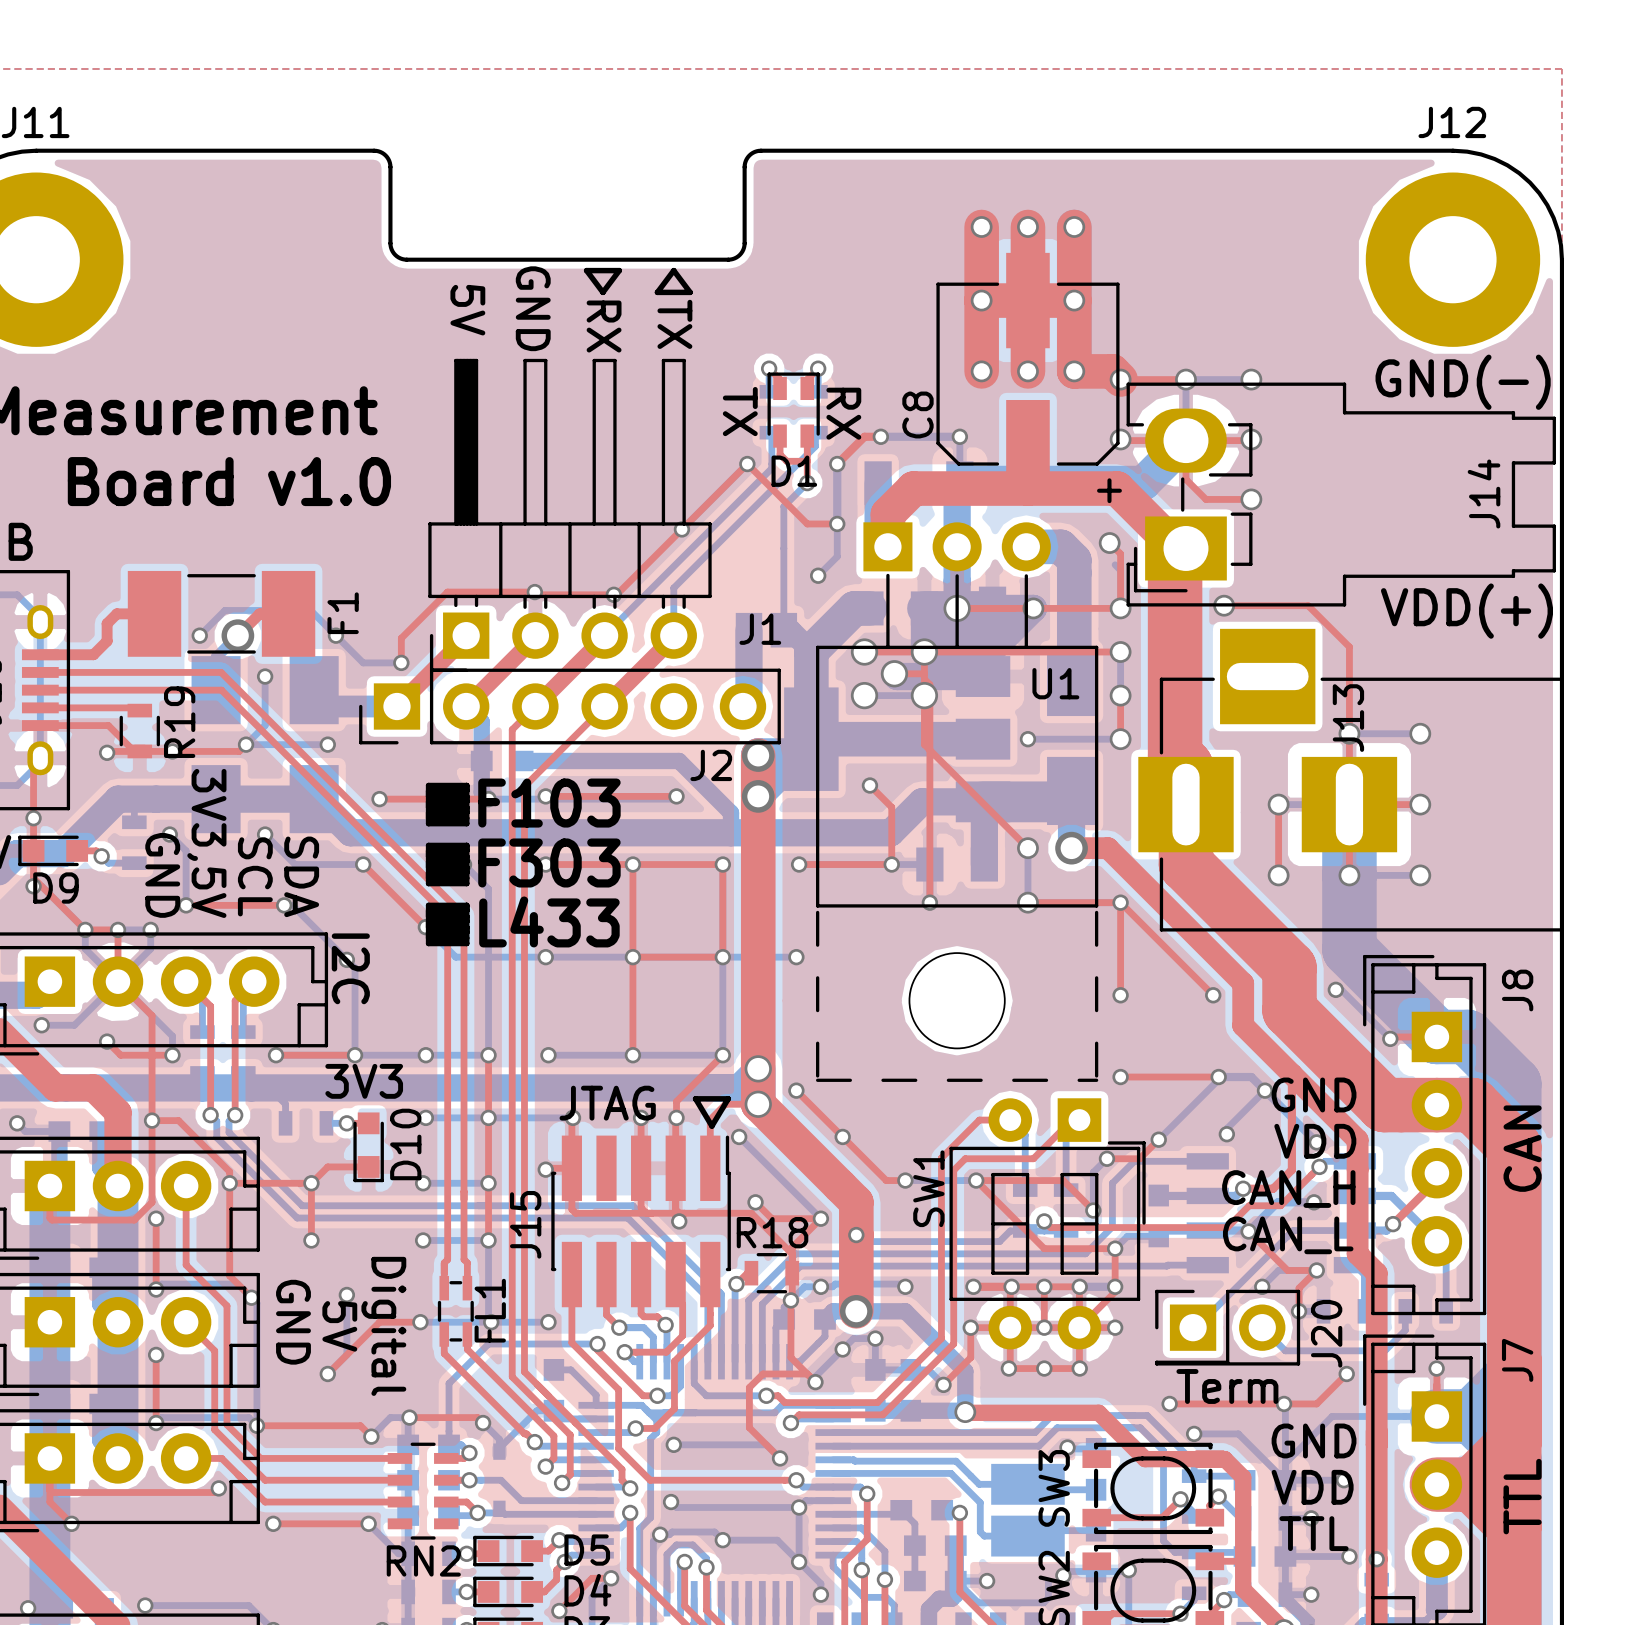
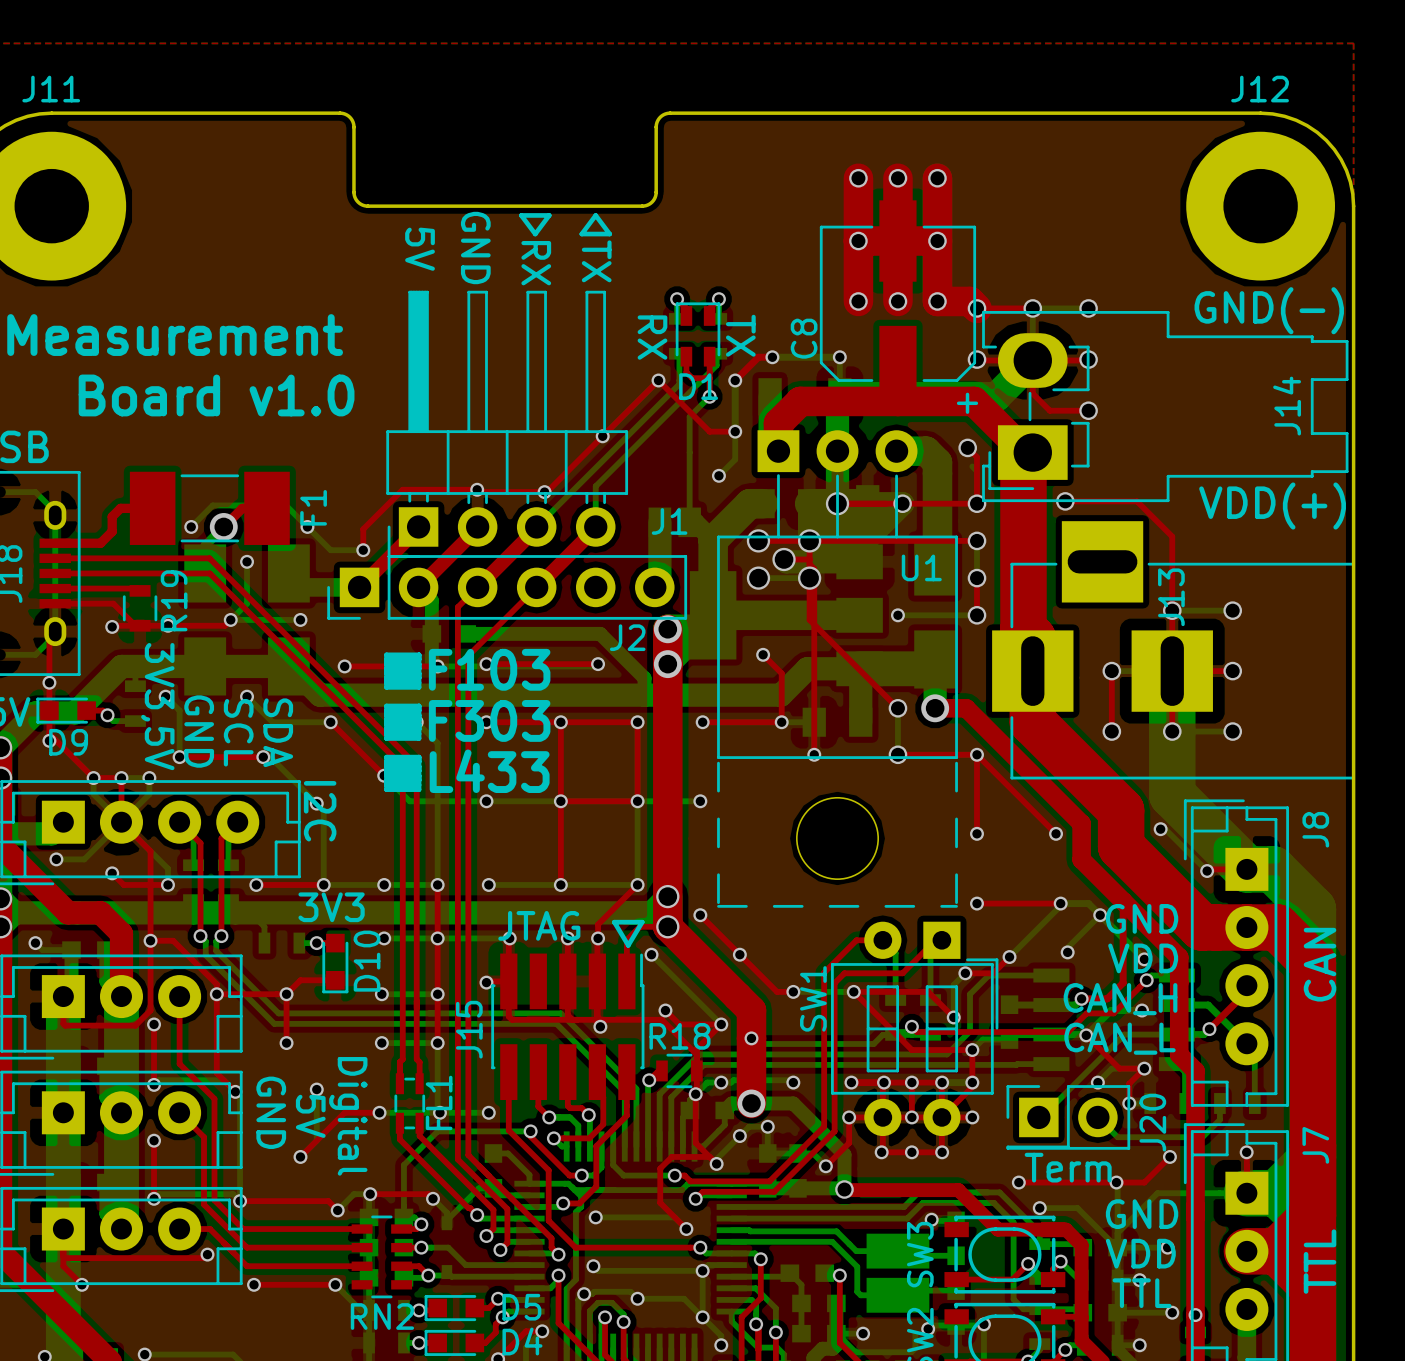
text: TX (740, 411) -> RX (652, 337)
text: RX (843, 413) -> TX (740, 335)
text position: 3V3,5V (206, 843) -> 3V3,5V (157, 706)
text position: GND (162, 875) -> GND (199, 731)

